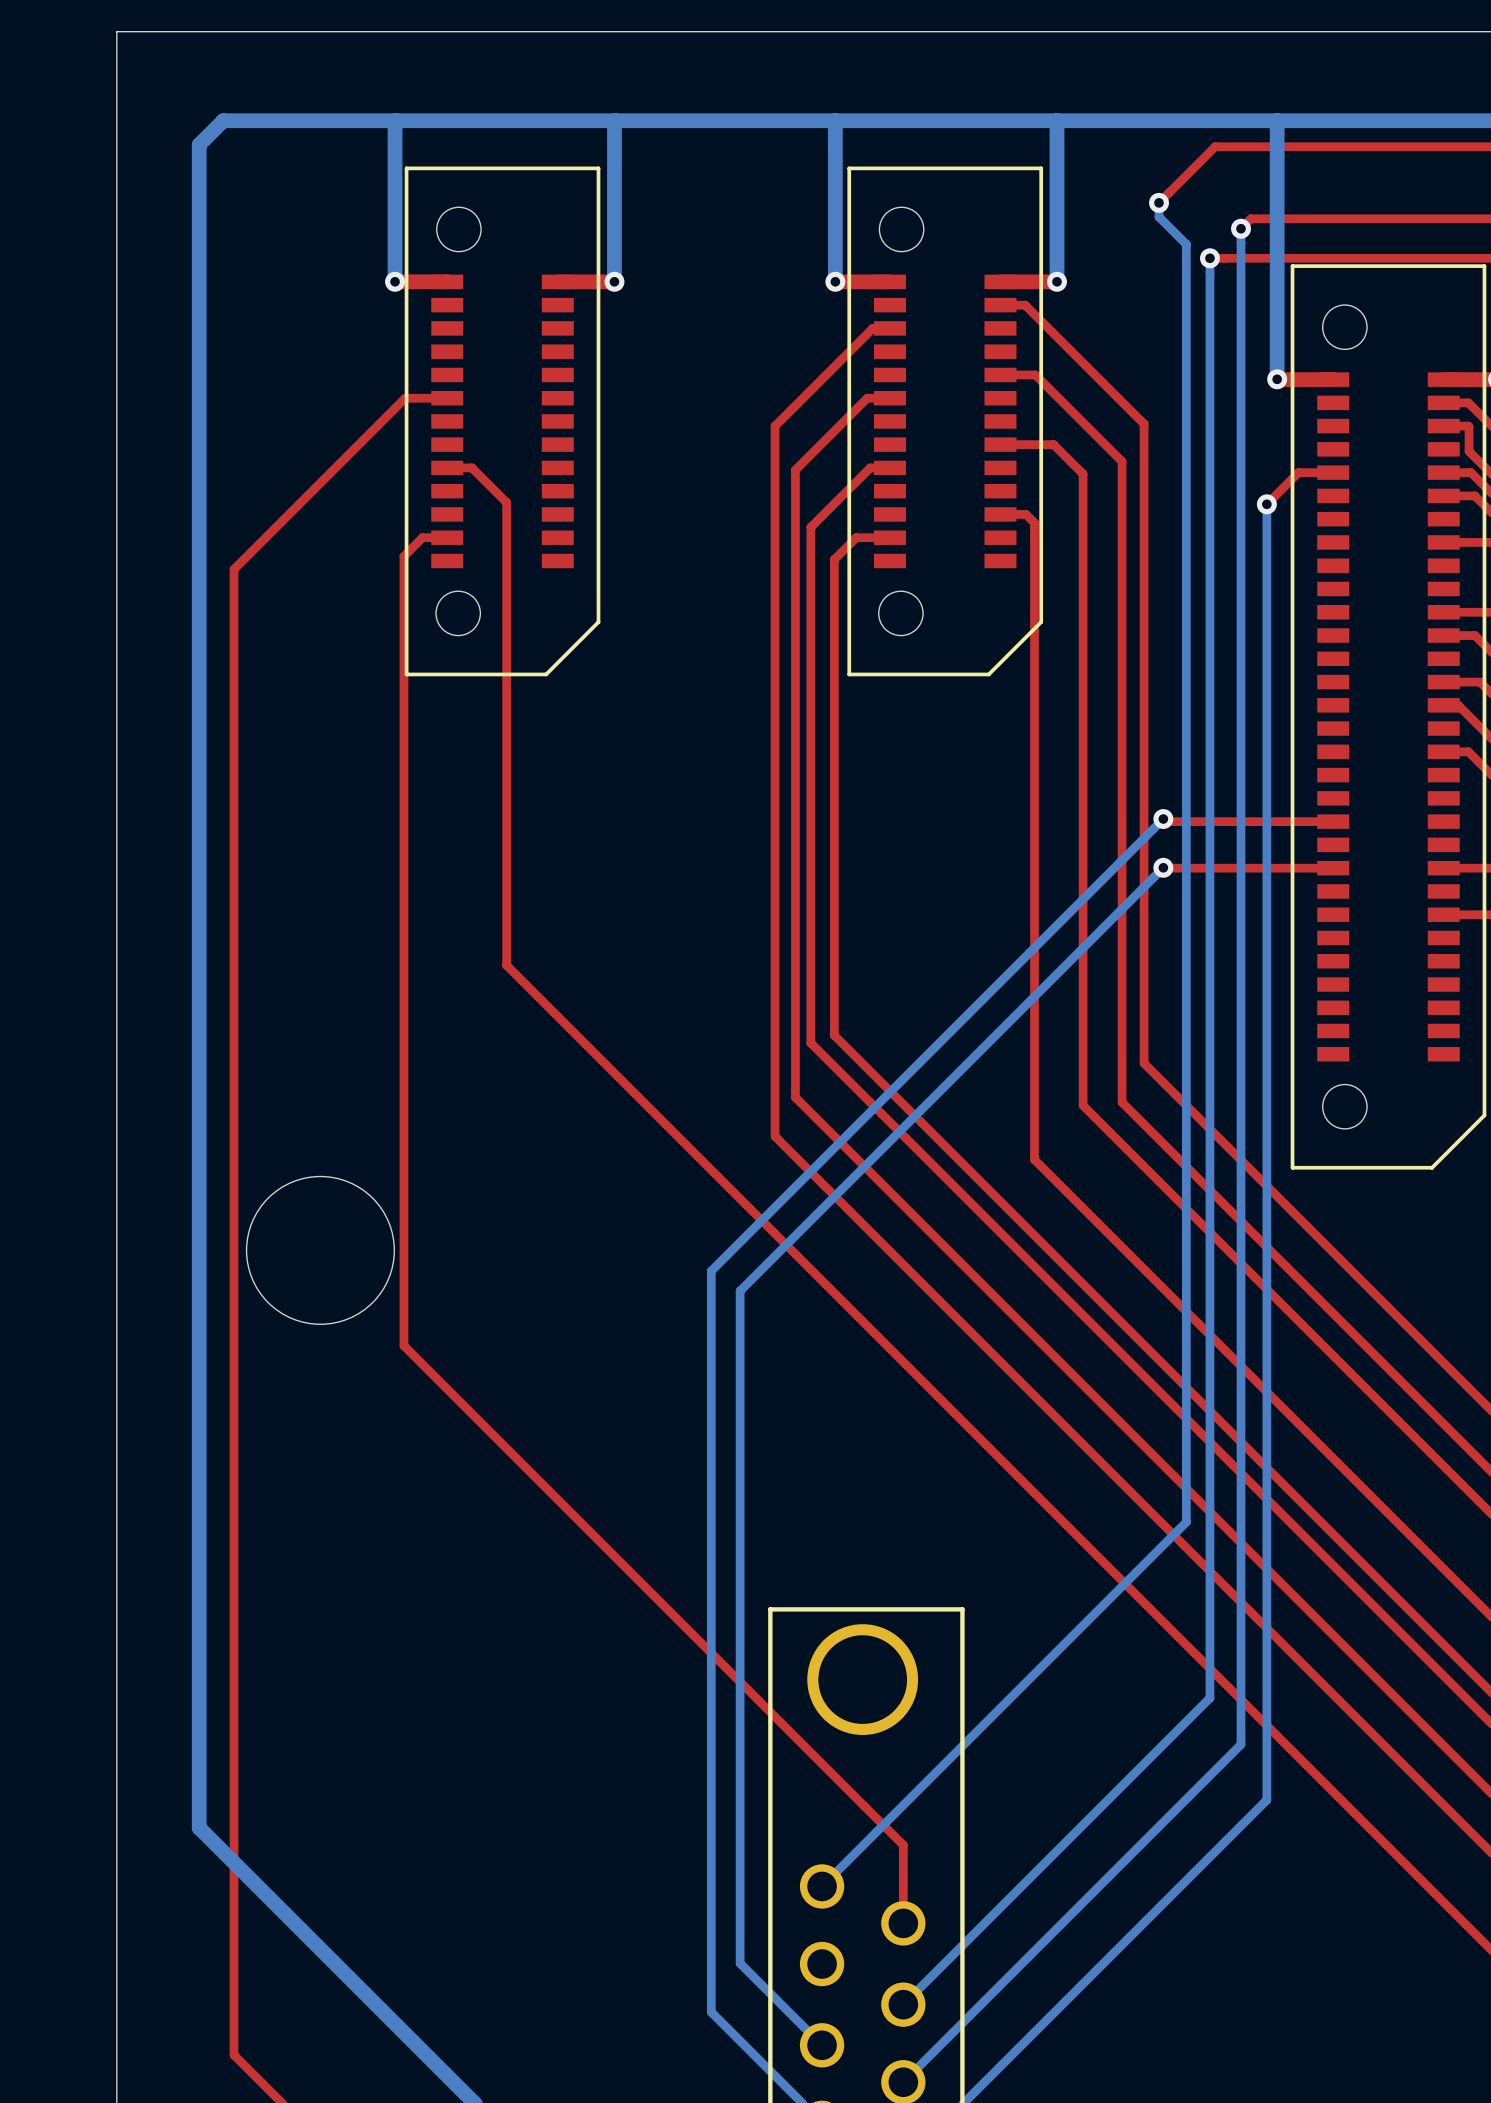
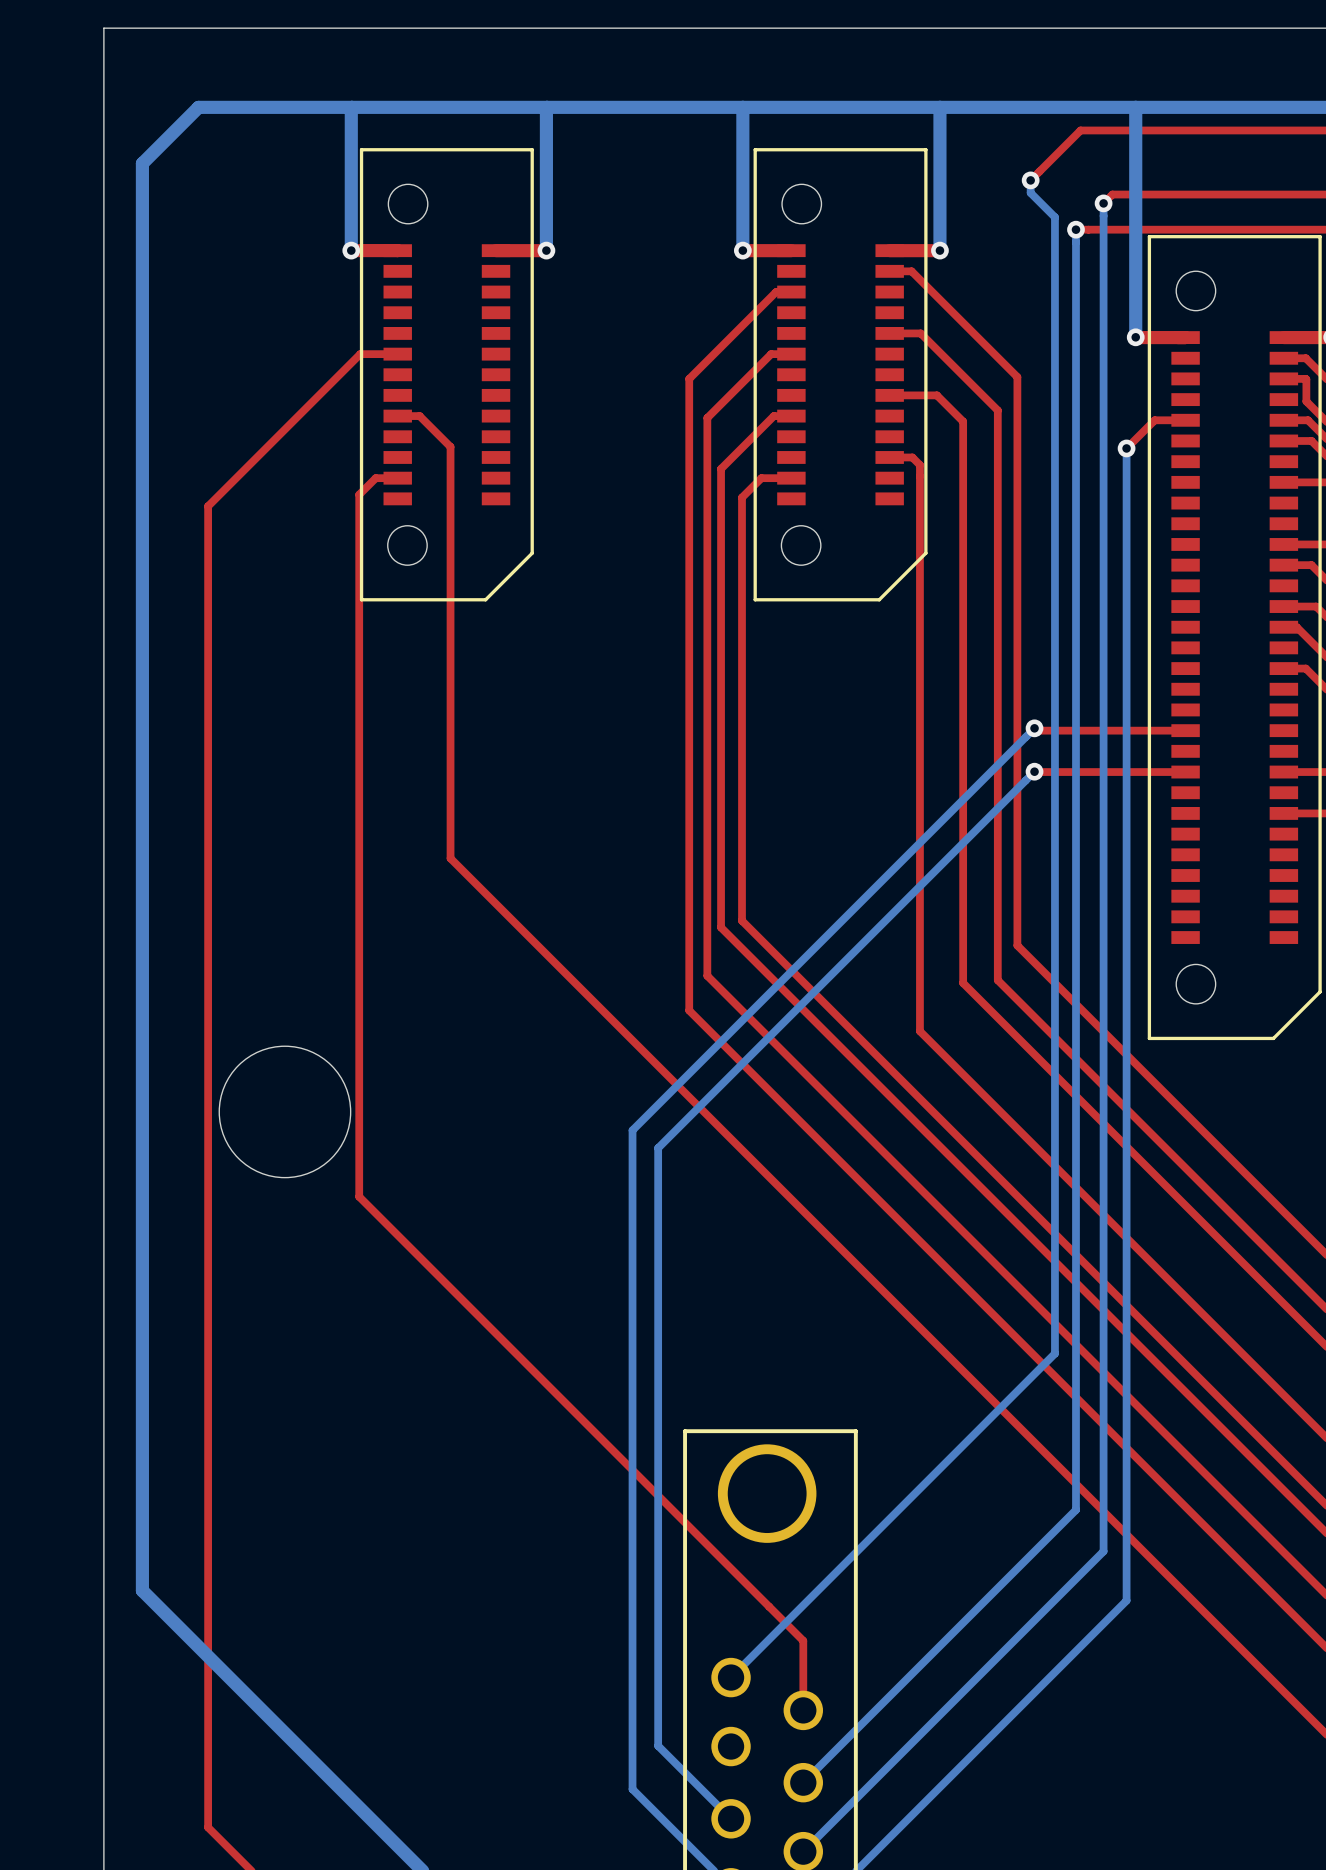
bottom track: (199, 144) (199, 1827) -> (177, 128) (142, 163) (142, 1590) (177, 1625)

